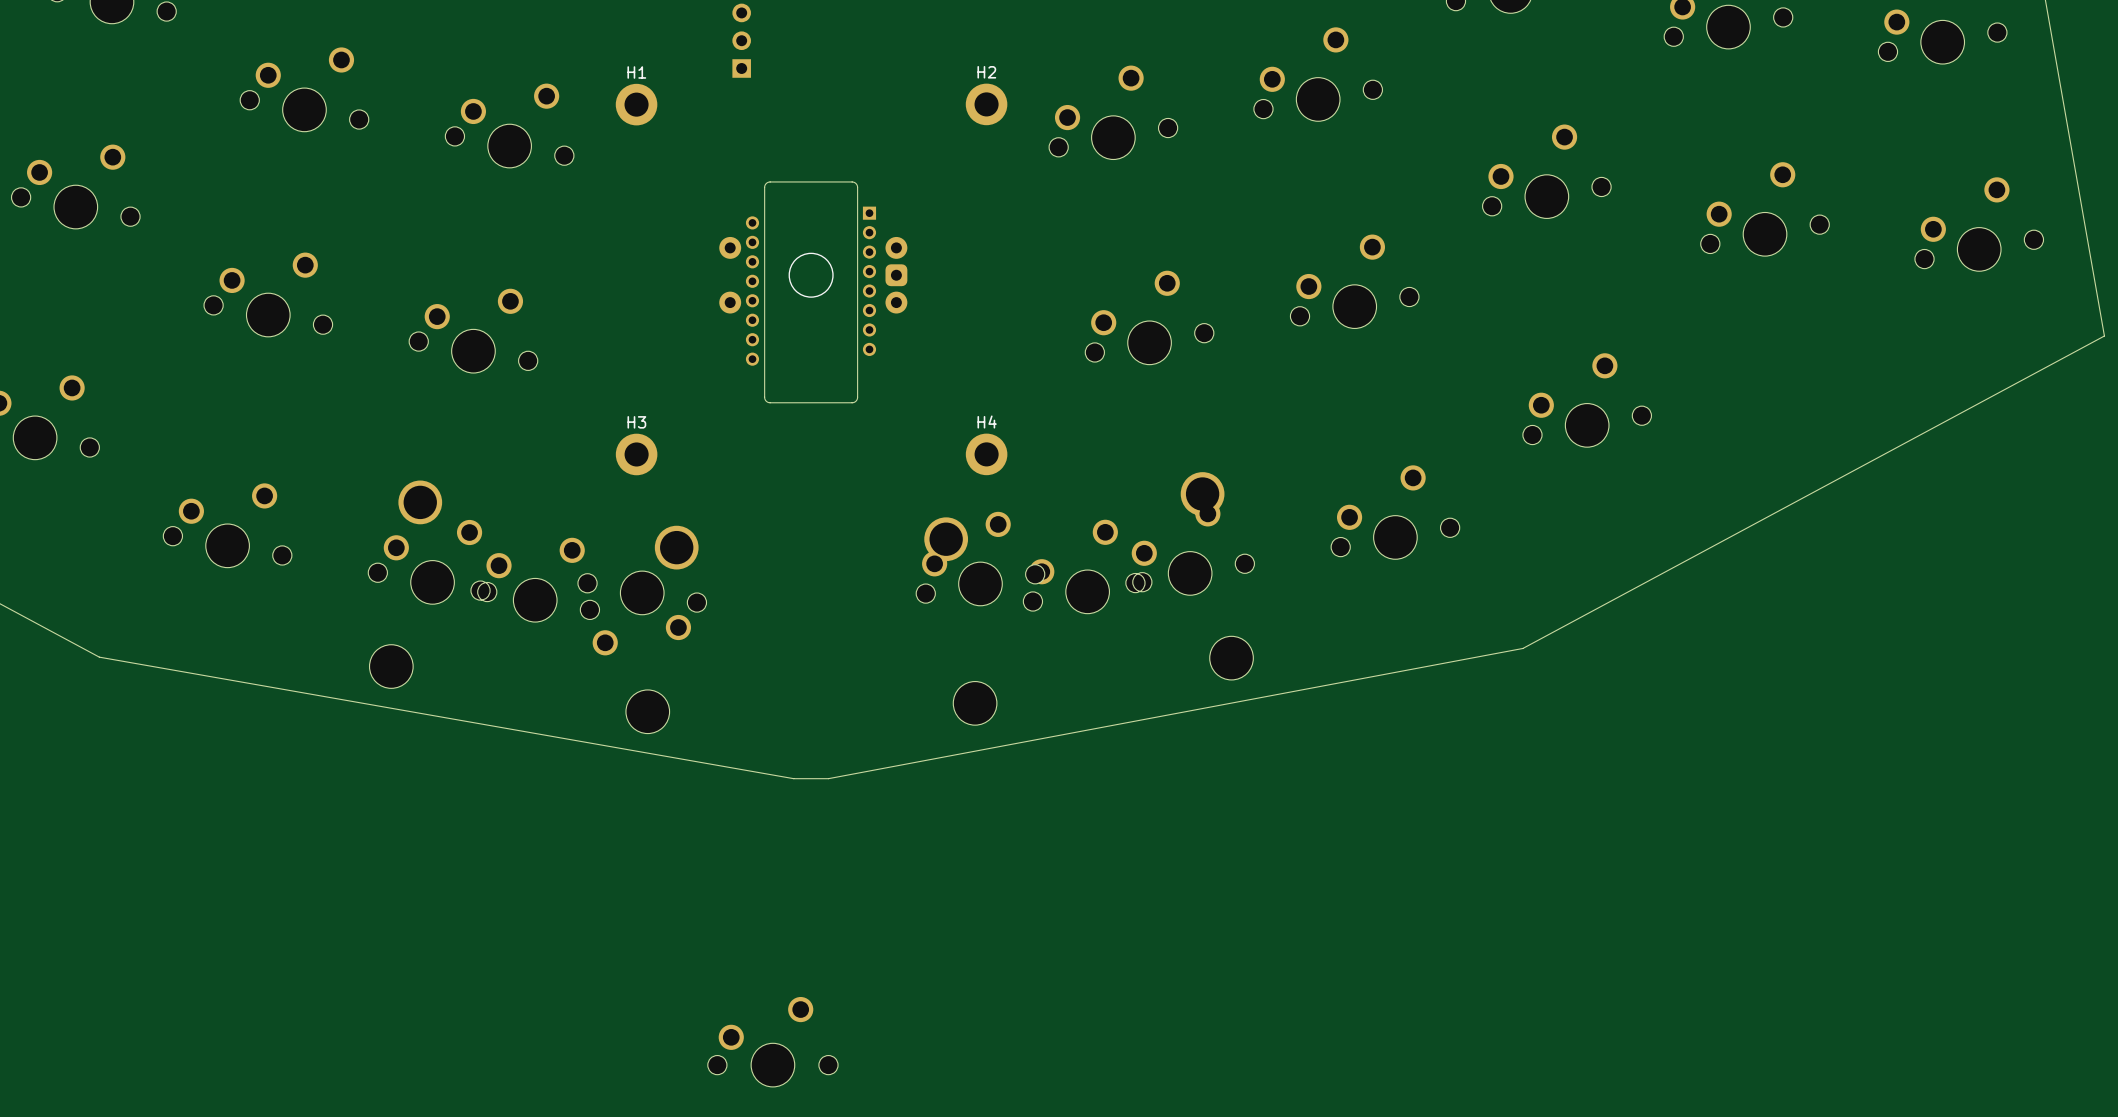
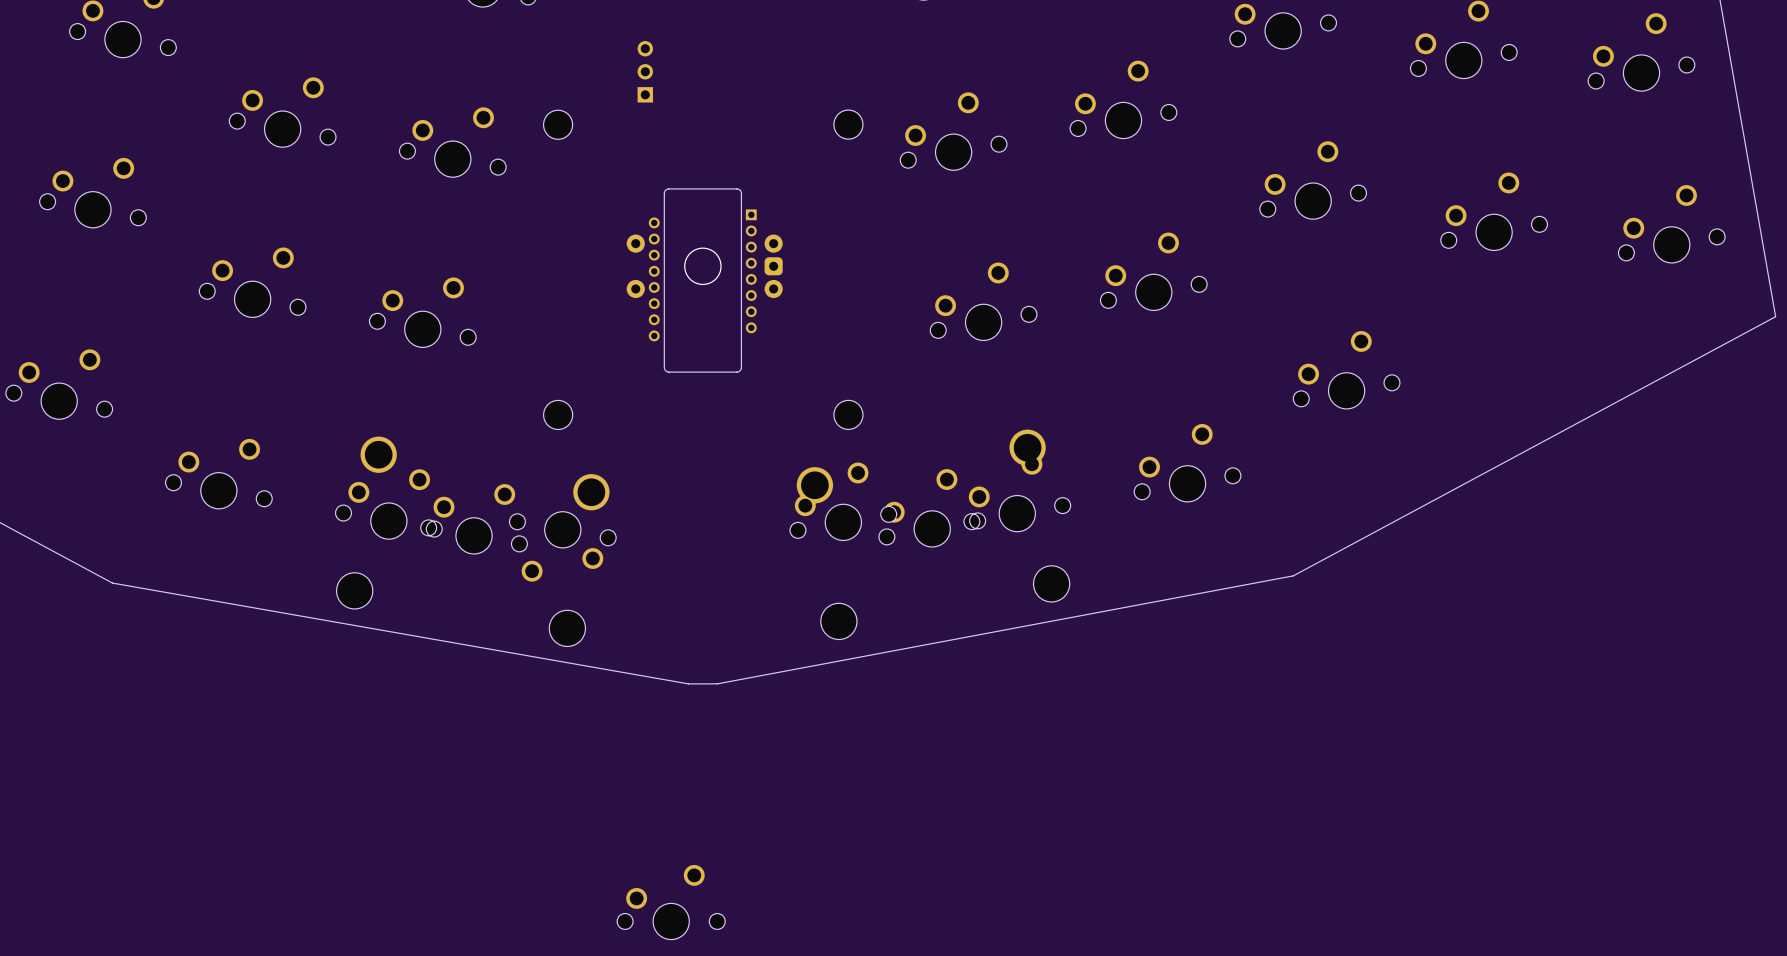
H1: (636, 104) -> none
part: none -> (558, 124)
H2: (986, 104) -> none
part: none -> (848, 124)
H3: (636, 454) -> none
part: none -> (558, 414)
H4: (986, 454) -> none
part: none -> (848, 414)

